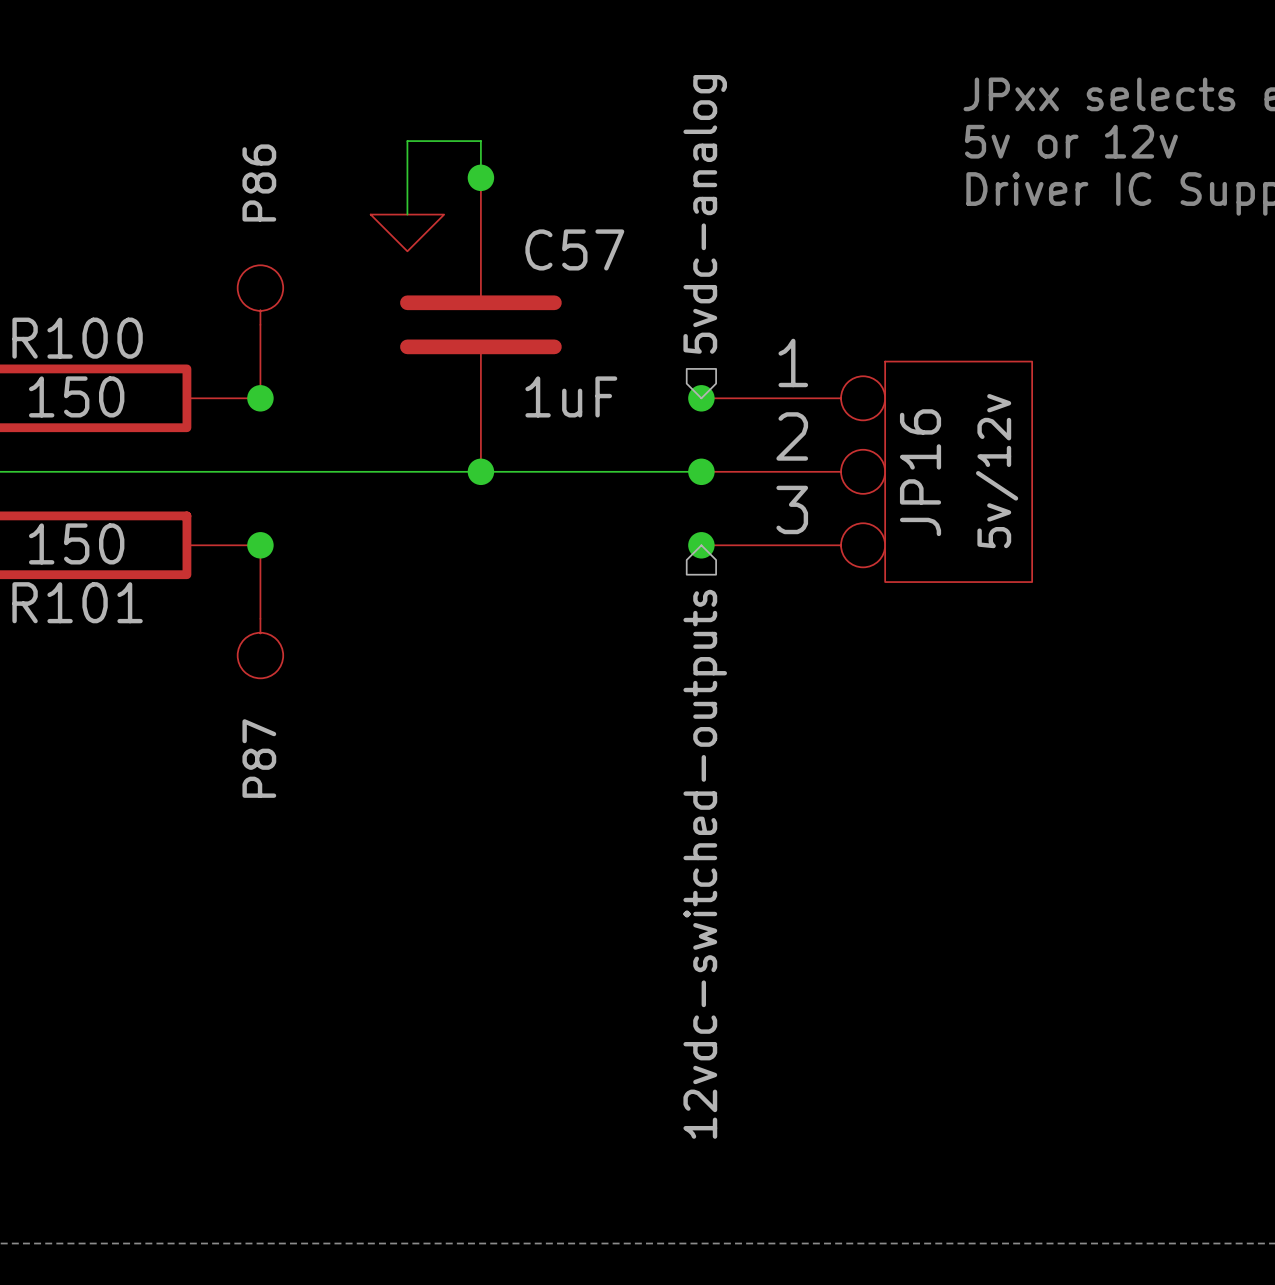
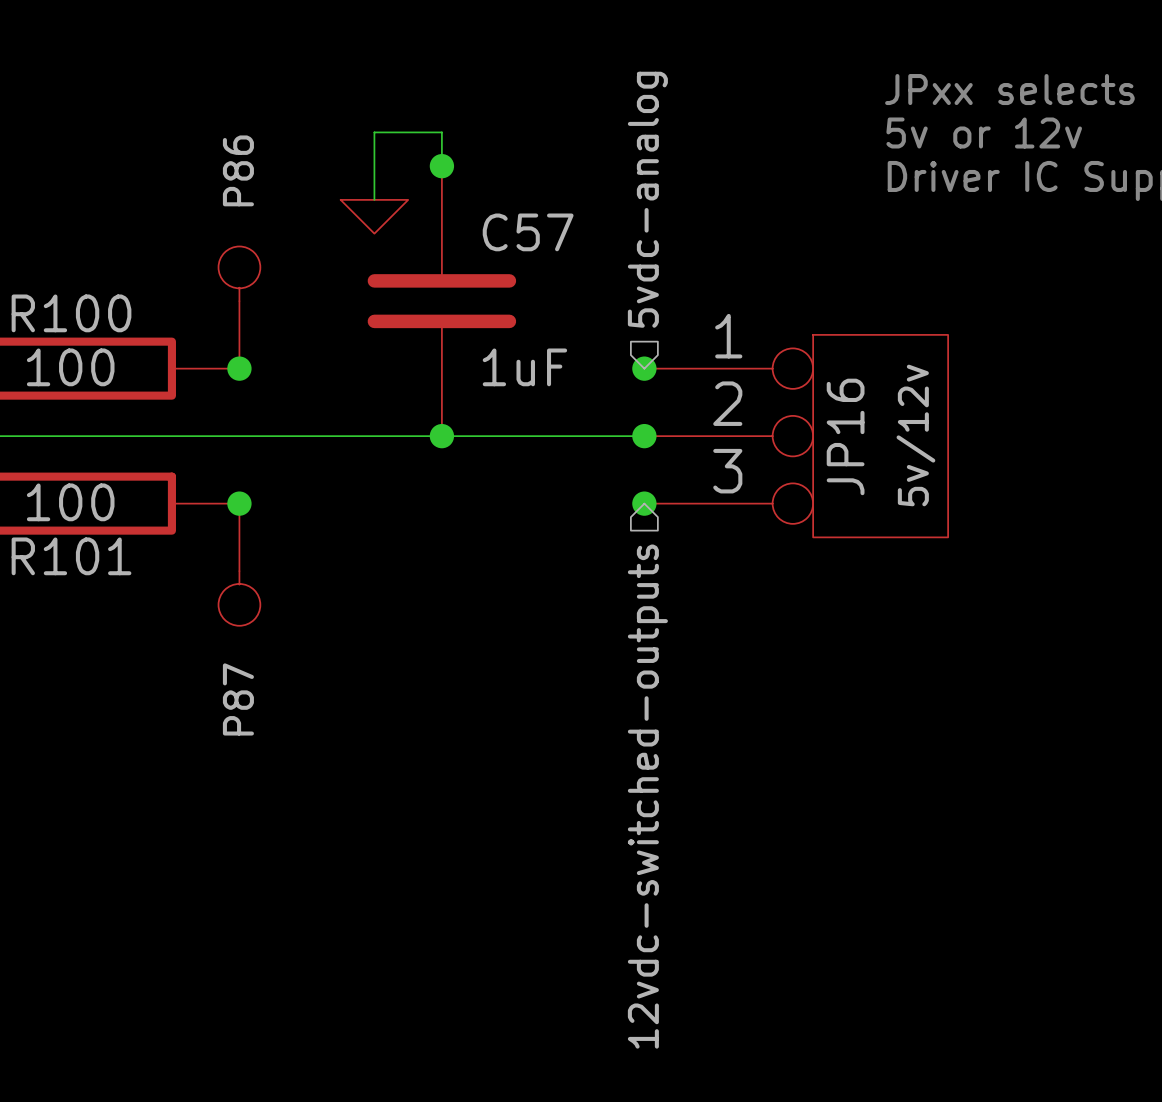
R100 value: 150 (76, 396) -> 100 (70, 367)
R101 value: 150 (76, 543) -> 100 (70, 502)

